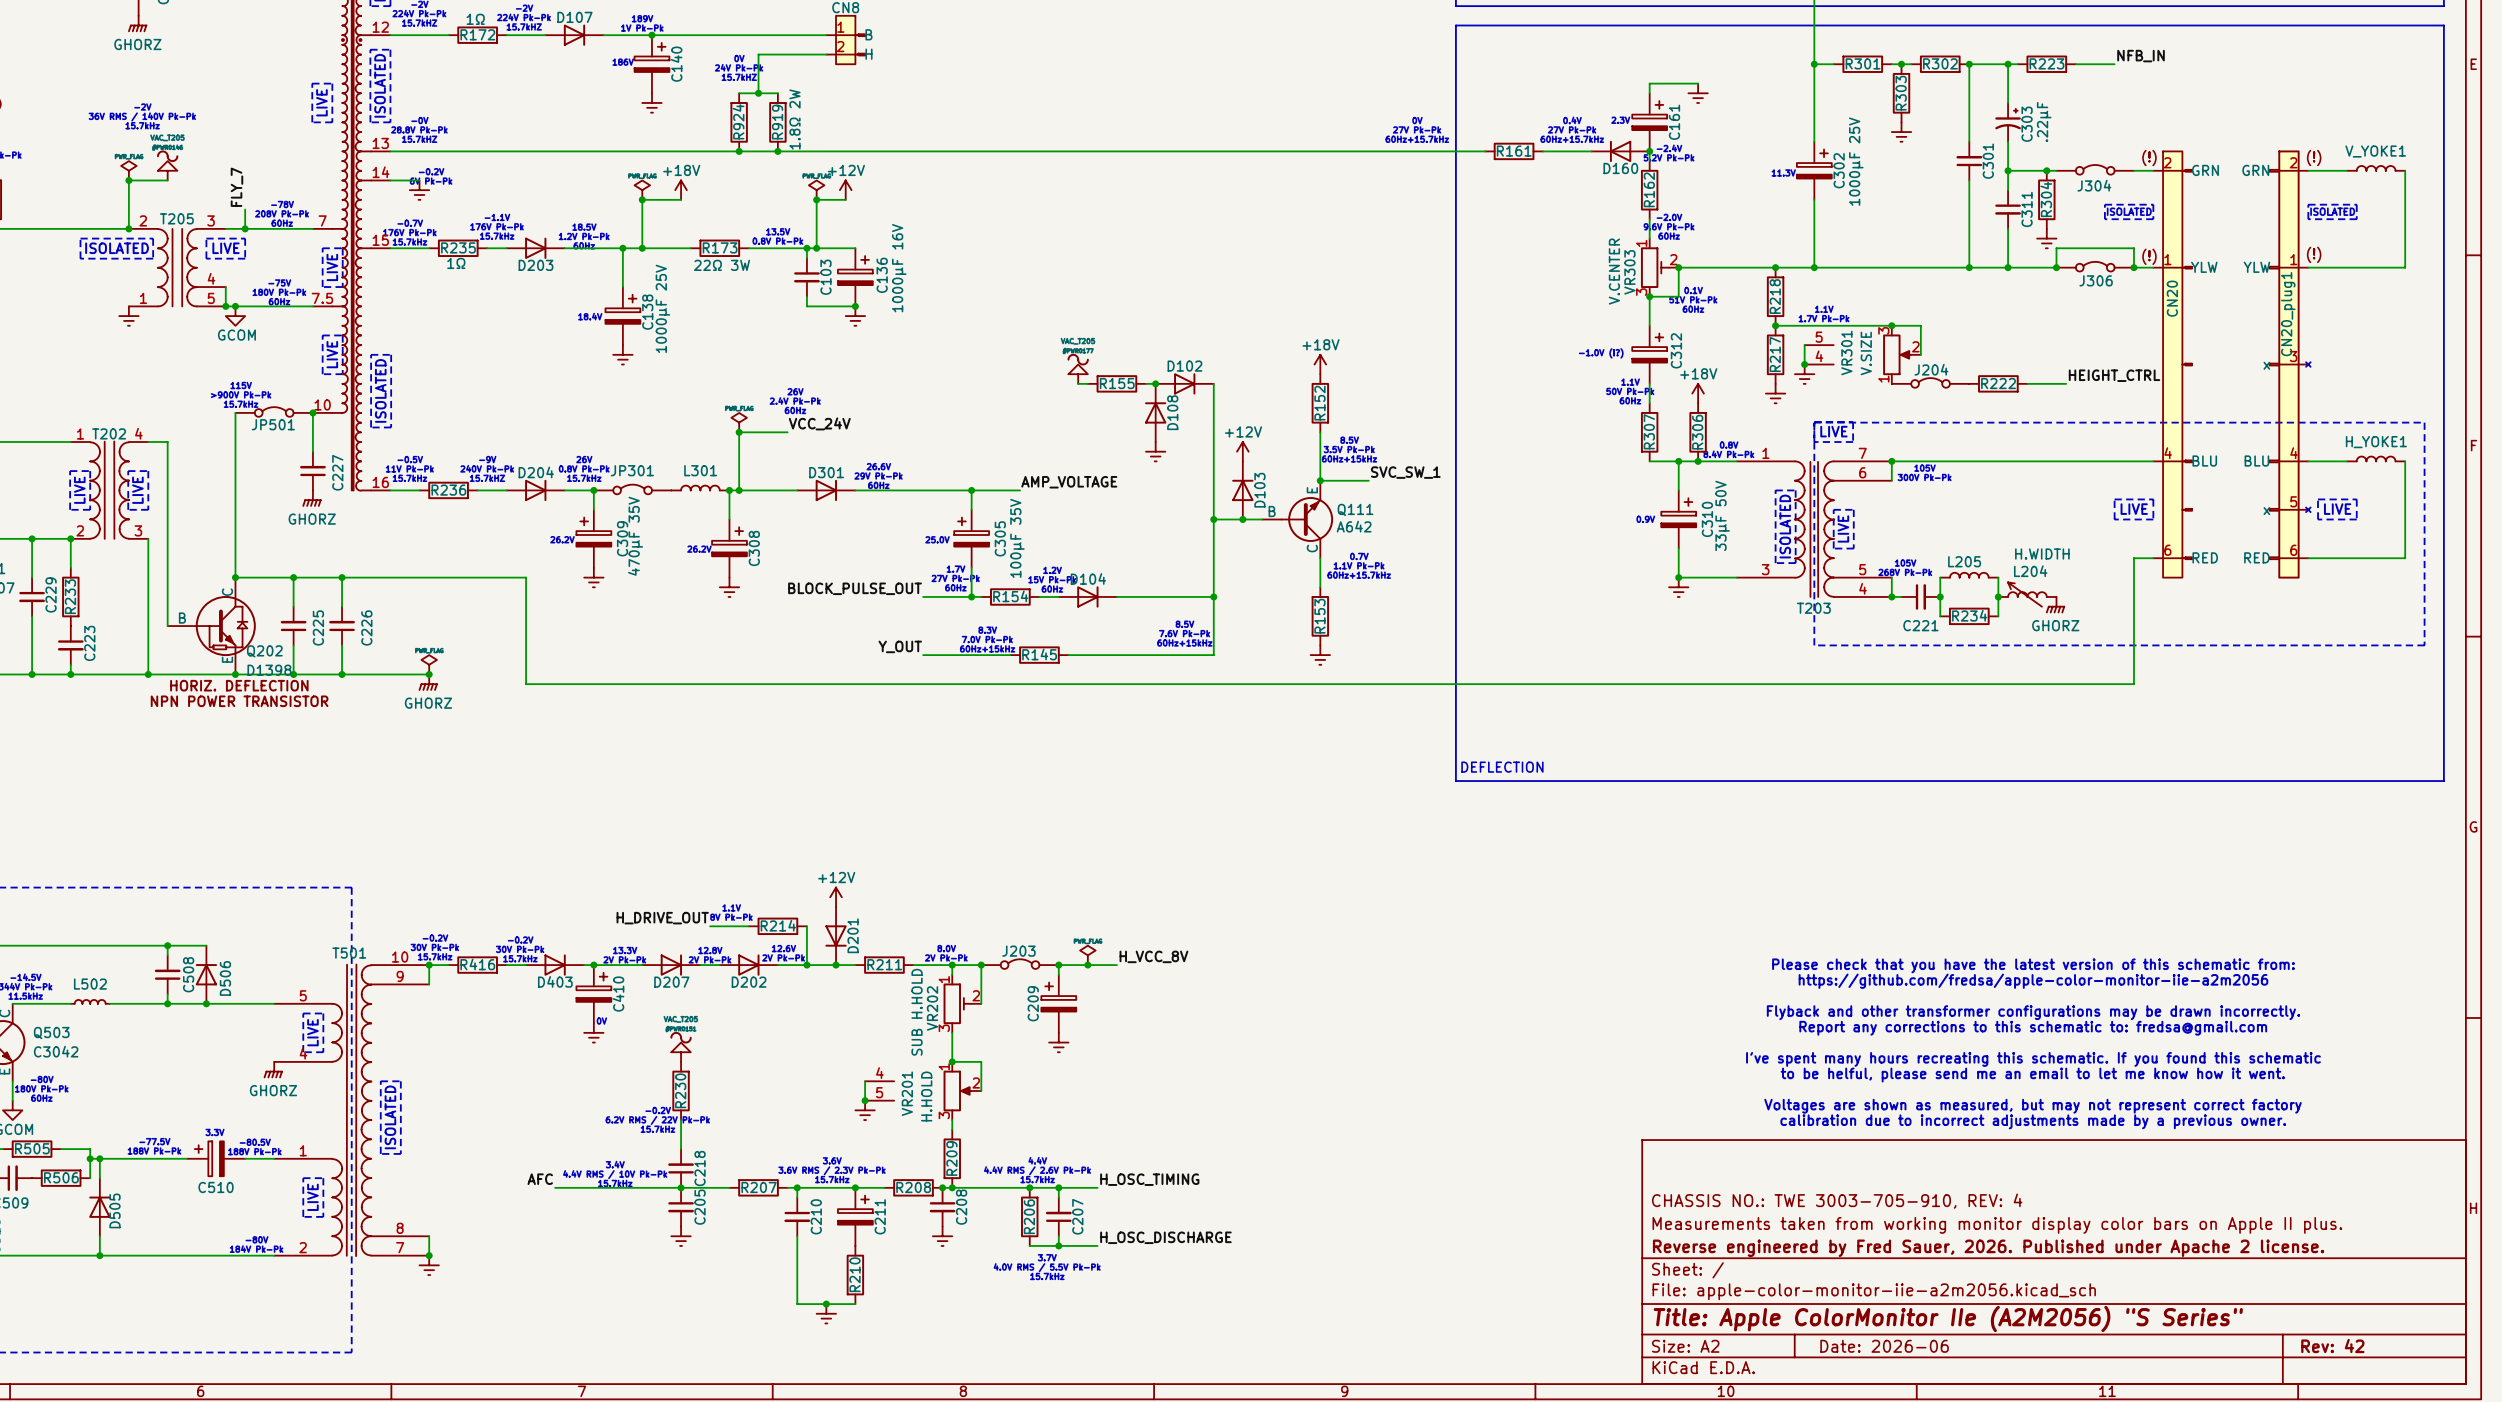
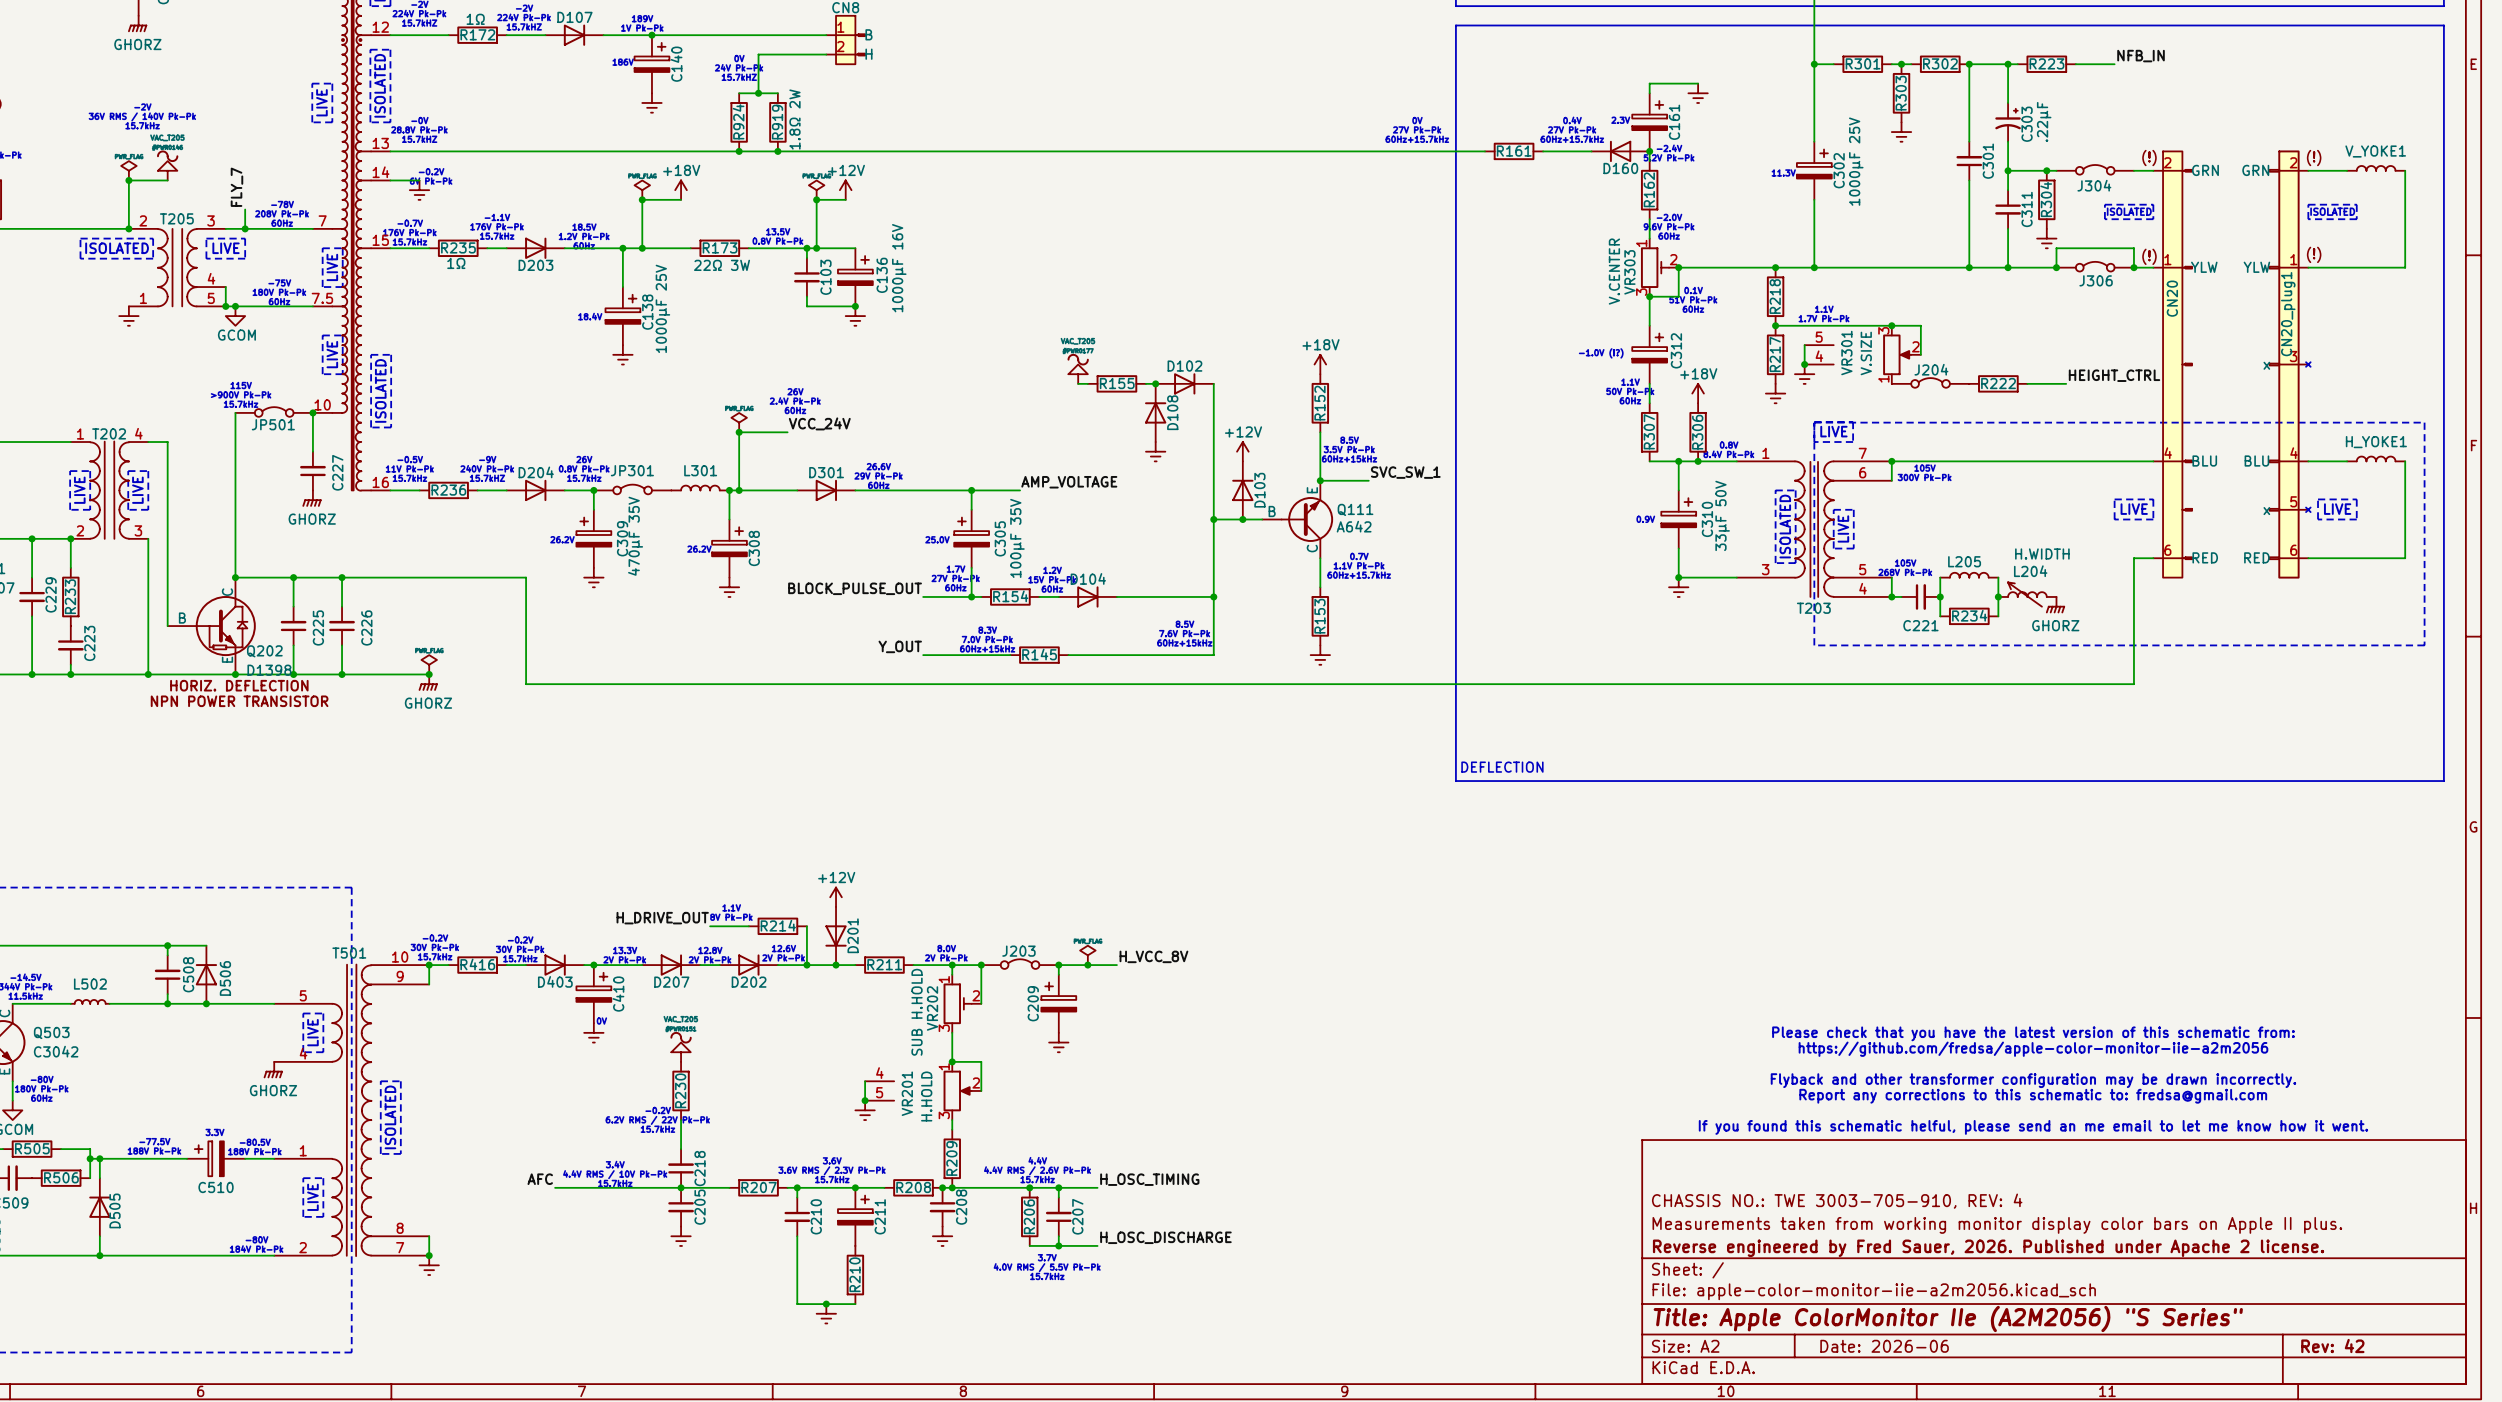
text position: Please check that you have the latest version of this schematic from: (2033, 965) -> Please check that you have the latest version of this schematic from: (2033, 1033)
text position: https://github.com/fredsa/apple-color-monitor-iie-a2m2056 (2033, 981) -> https://github.com/fredsa/apple-color-monitor-iie-a2m2056 (2033, 1049)
text: Flyback and other transformer configurations may be drawn incorrectly. (2033, 1012) -> none
text position: Report any corrections to this schematic to: fredsa@gmail.com (2033, 1028) -> Report any corrections to this schematic to: fredsa@gmail.com (2033, 1096)
text: I've spent many hours recreating this schematic. If you found this schematic (2033, 1059) -> none
text: to be helful, please send me an email to let me know how it went. (2032, 1075) -> Flyback and other transformer configuration may be drawn incorrectly. (2033, 1080)
text: Voltages are shown as measured, but may not represent correct factory (2033, 1106) -> none
text: calibration due to incorrect adjustments made by a previous owner. (2033, 1121) -> If you found this schematic helful, please send an me email to let me know how it went. (2033, 1127)

